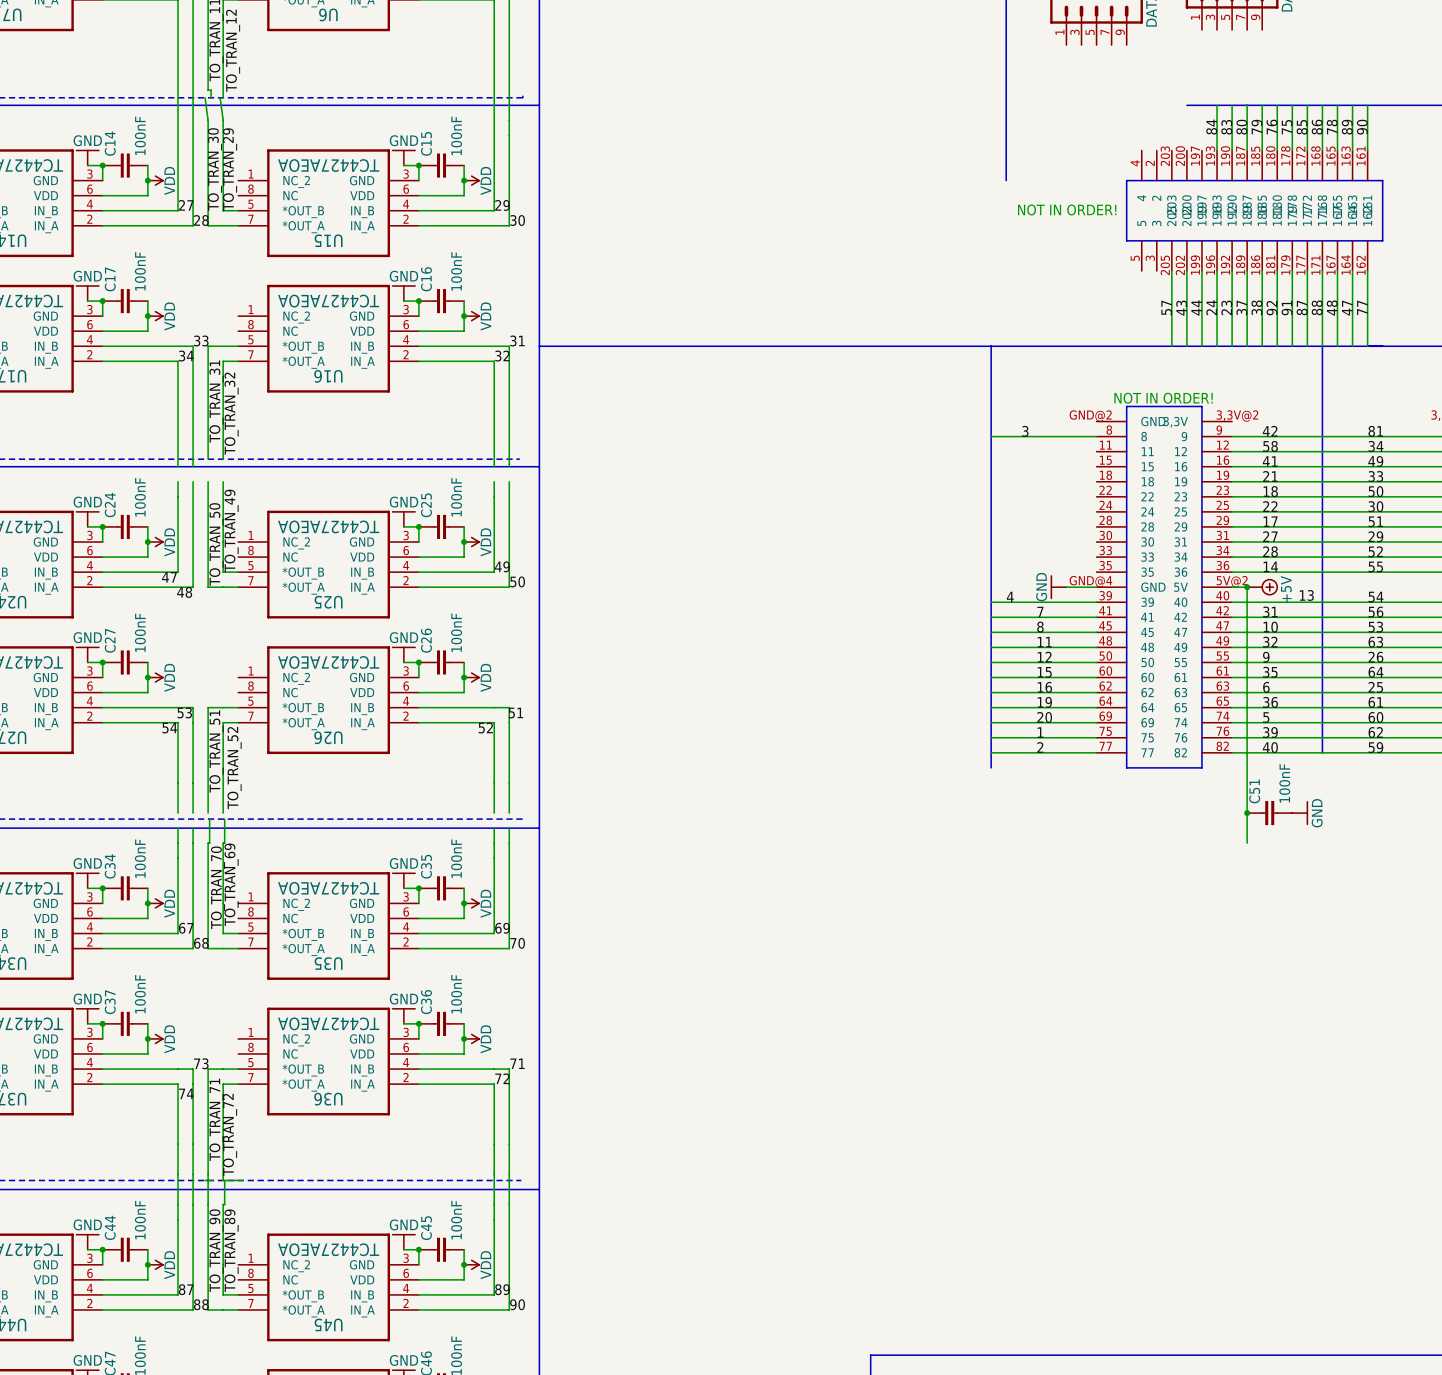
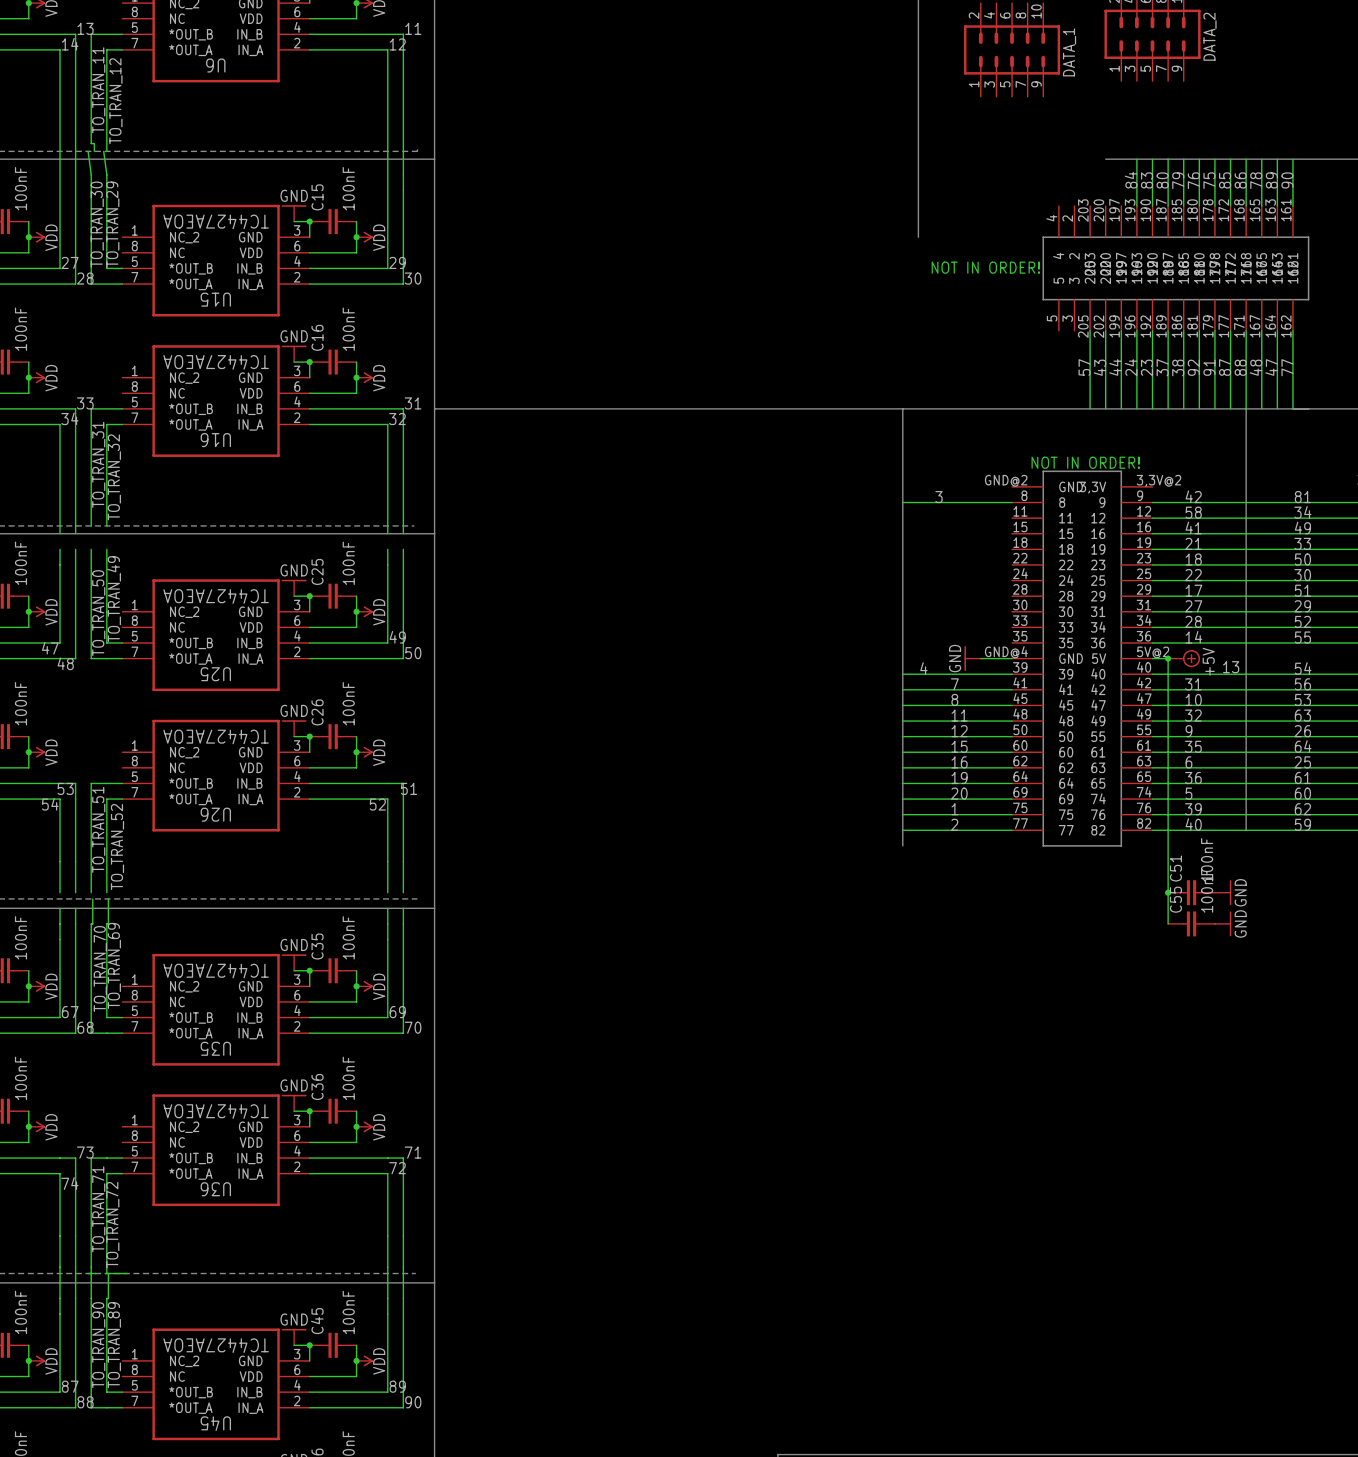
C55: none -> 100nF (1191, 923)
power symbol: none -> GND (1223, 923)

